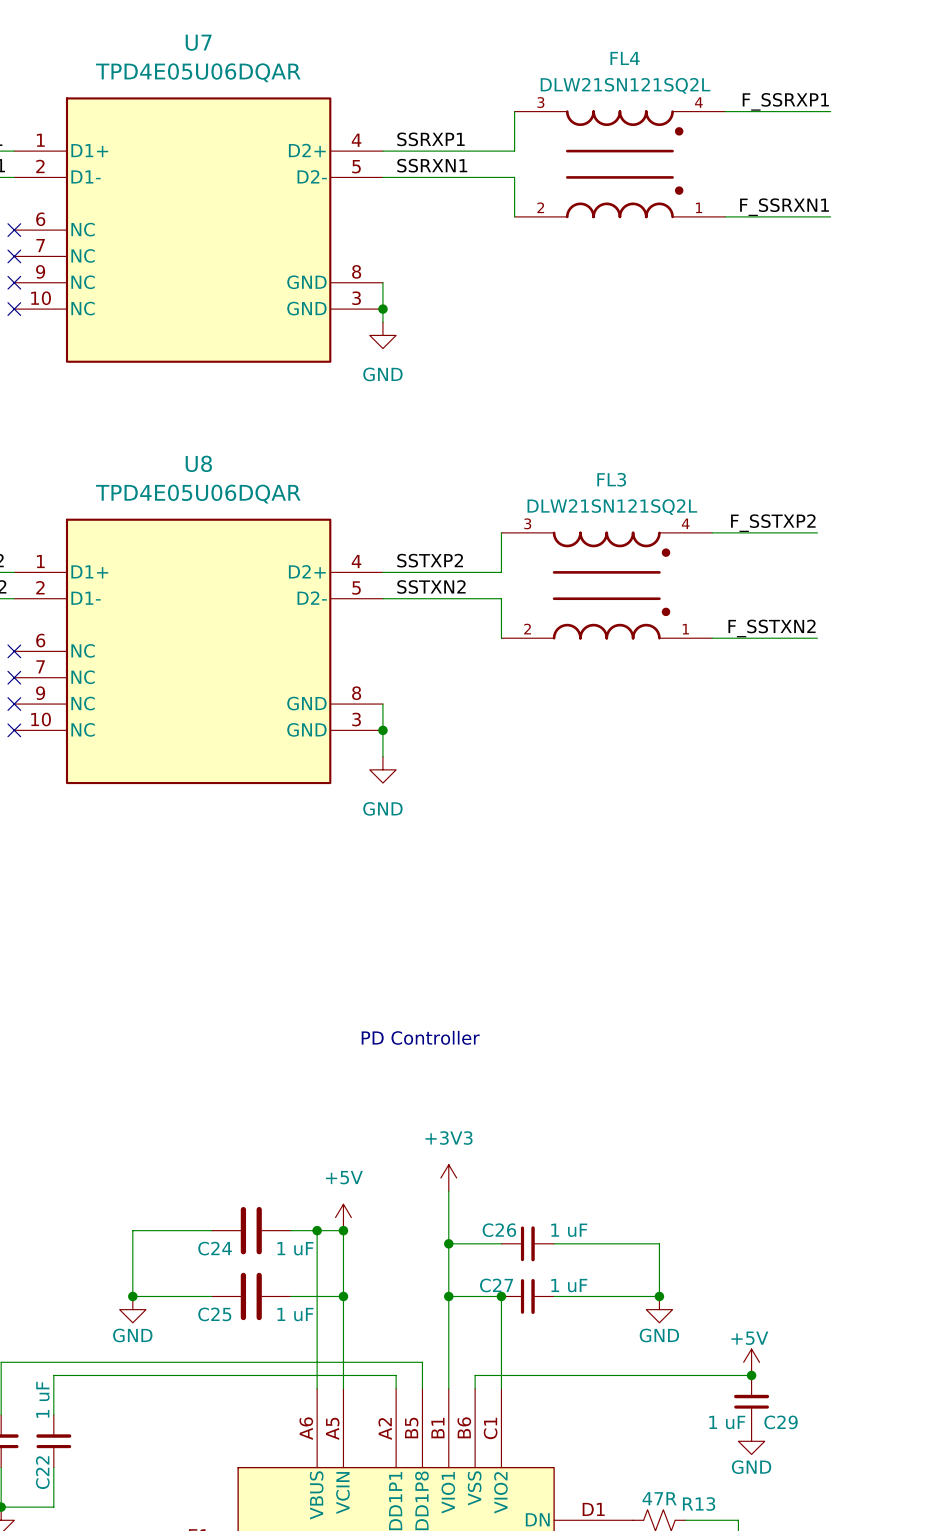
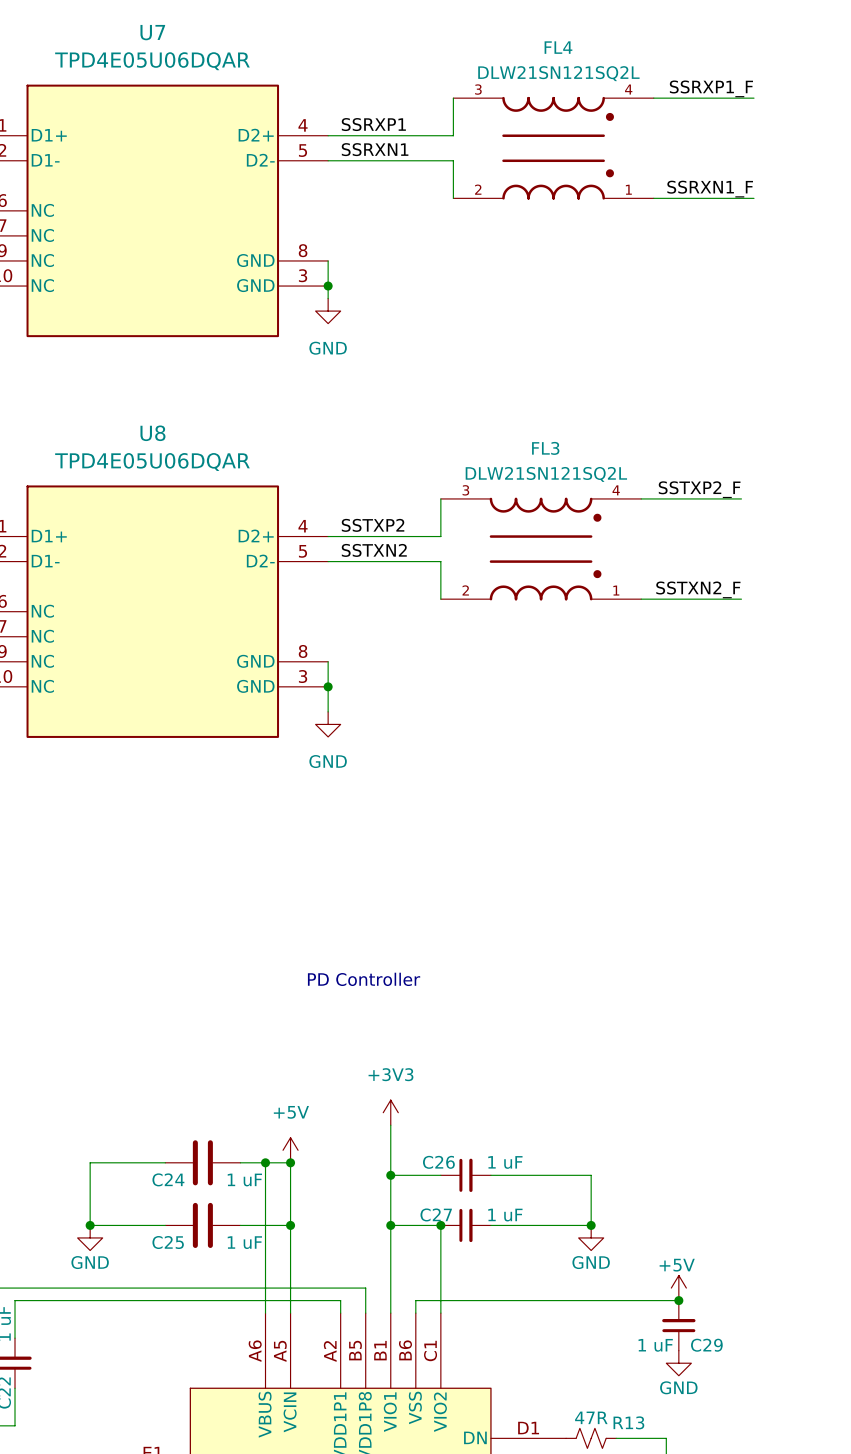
label: F_SSRXP1 (785, 101) -> SSRXP1_F (711, 88)
label: F_SSRXN1 (784, 207) -> SSRXN1_F (710, 189)
label: F_SSTXP2 (773, 523) -> SSTXP2_F (699, 489)
label: F_SSTXN2 (772, 628) -> SSTXN2_F (698, 589)

